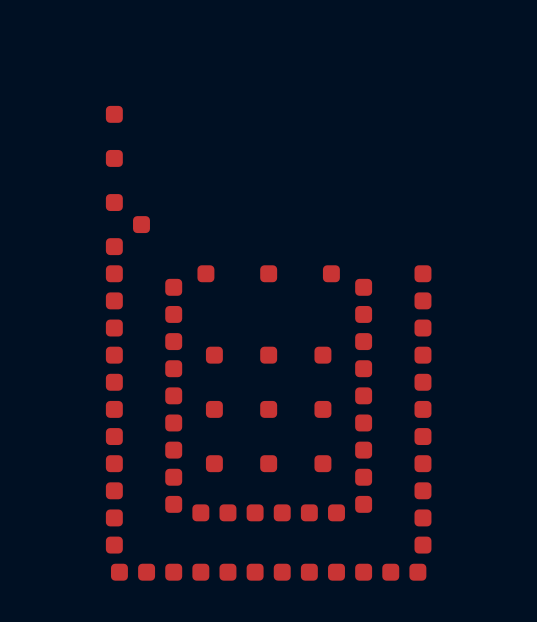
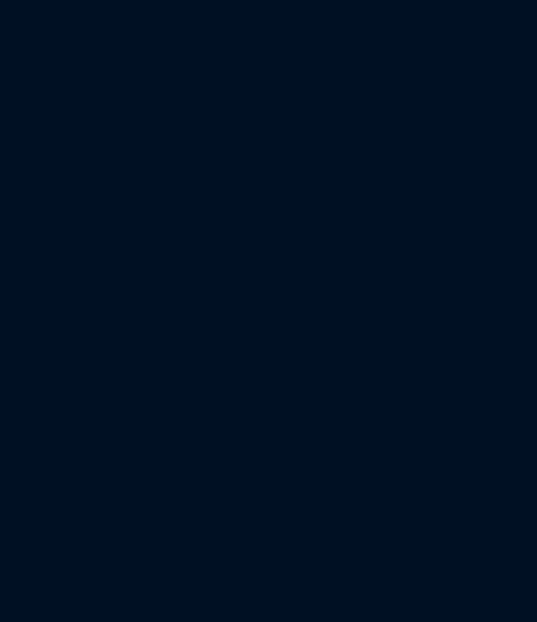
part: (268, 343) -> none

